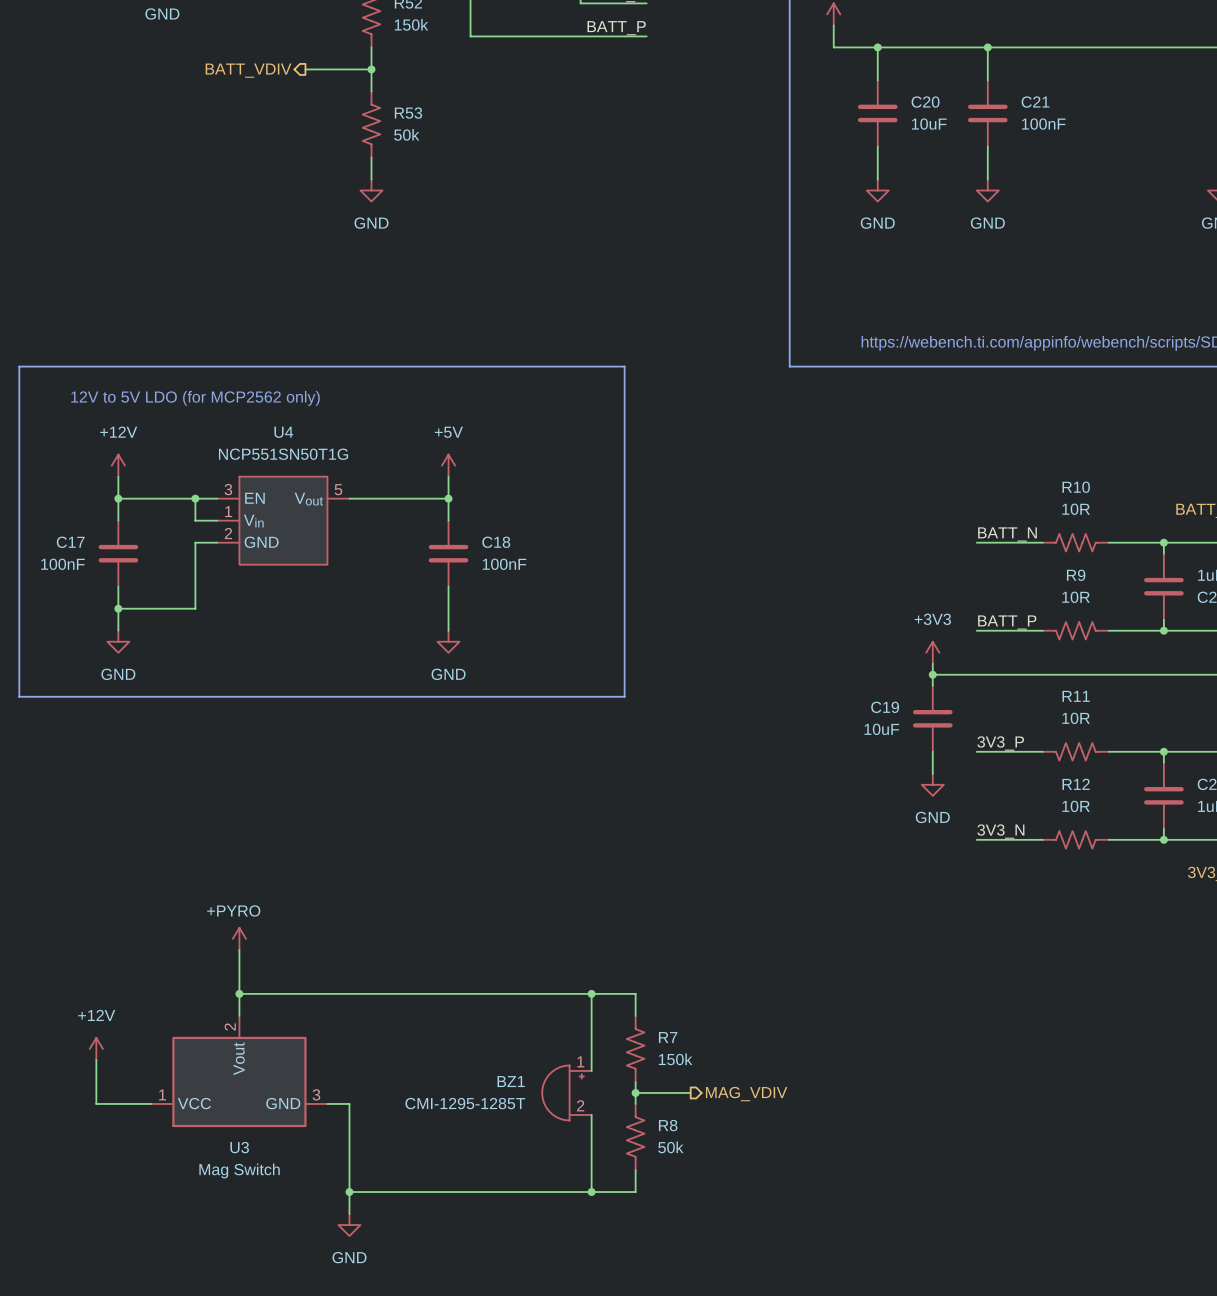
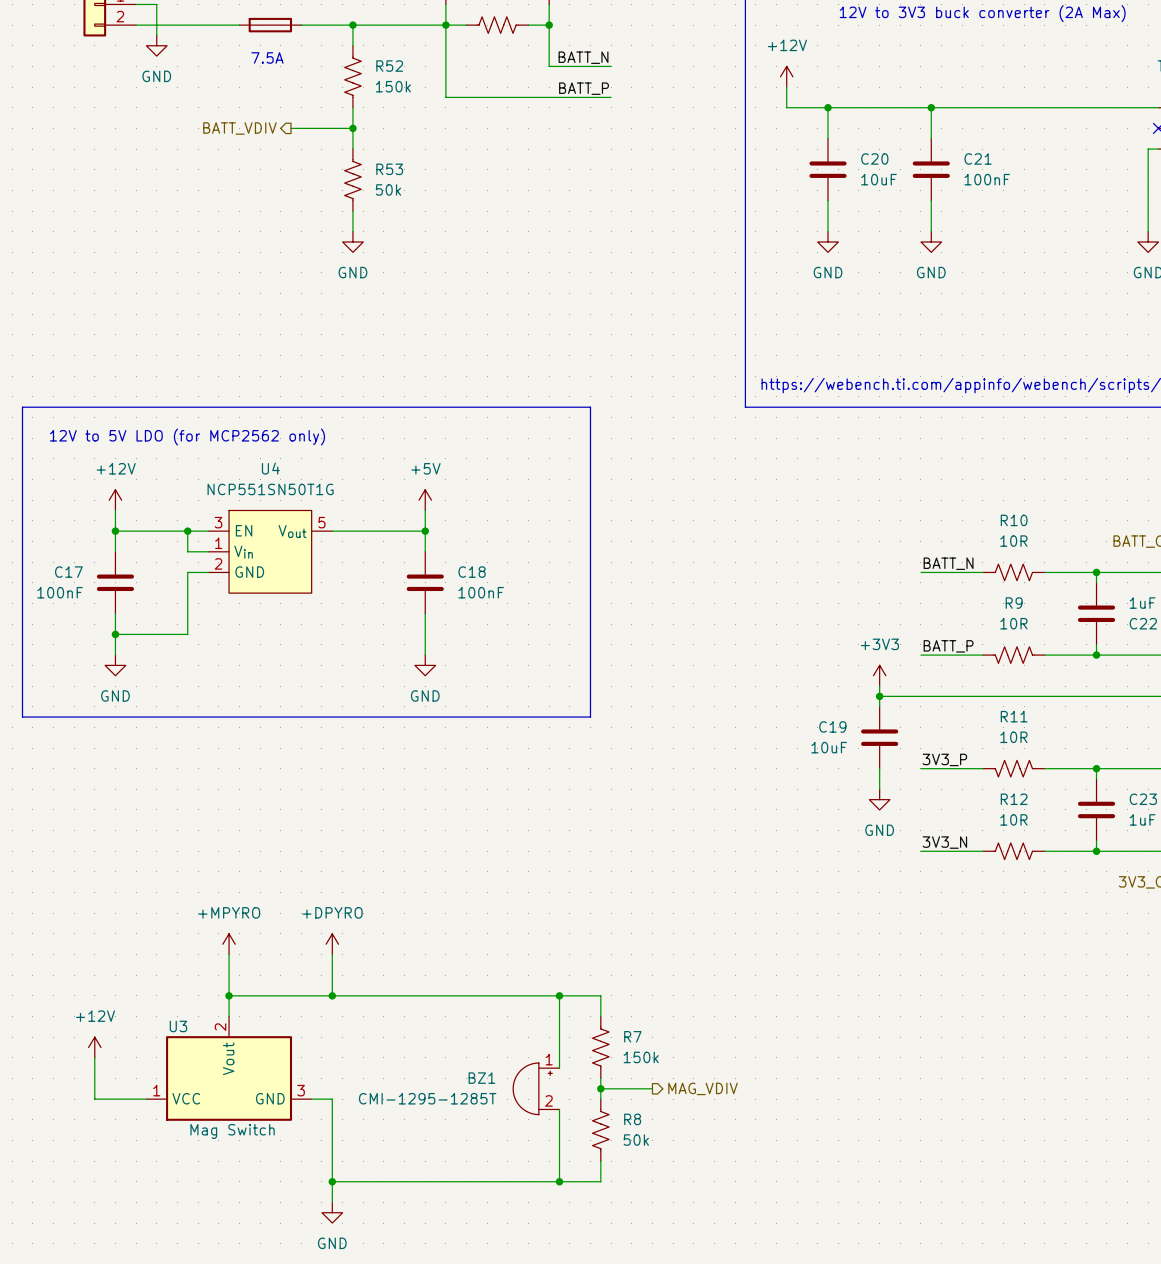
power symbol: +PYRO (239, 938) -> +MPYRO (229, 944)
power symbol: none -> +DPYRO (332, 944)
wire: none -> (332, 954) (332, 995)
junction: none -> (332, 995)
U3 name position: U3 (239, 1147) -> U3 (178, 1026)
U3 value position: Mag Switch (239, 1170) -> Mag Switch (232, 1131)

